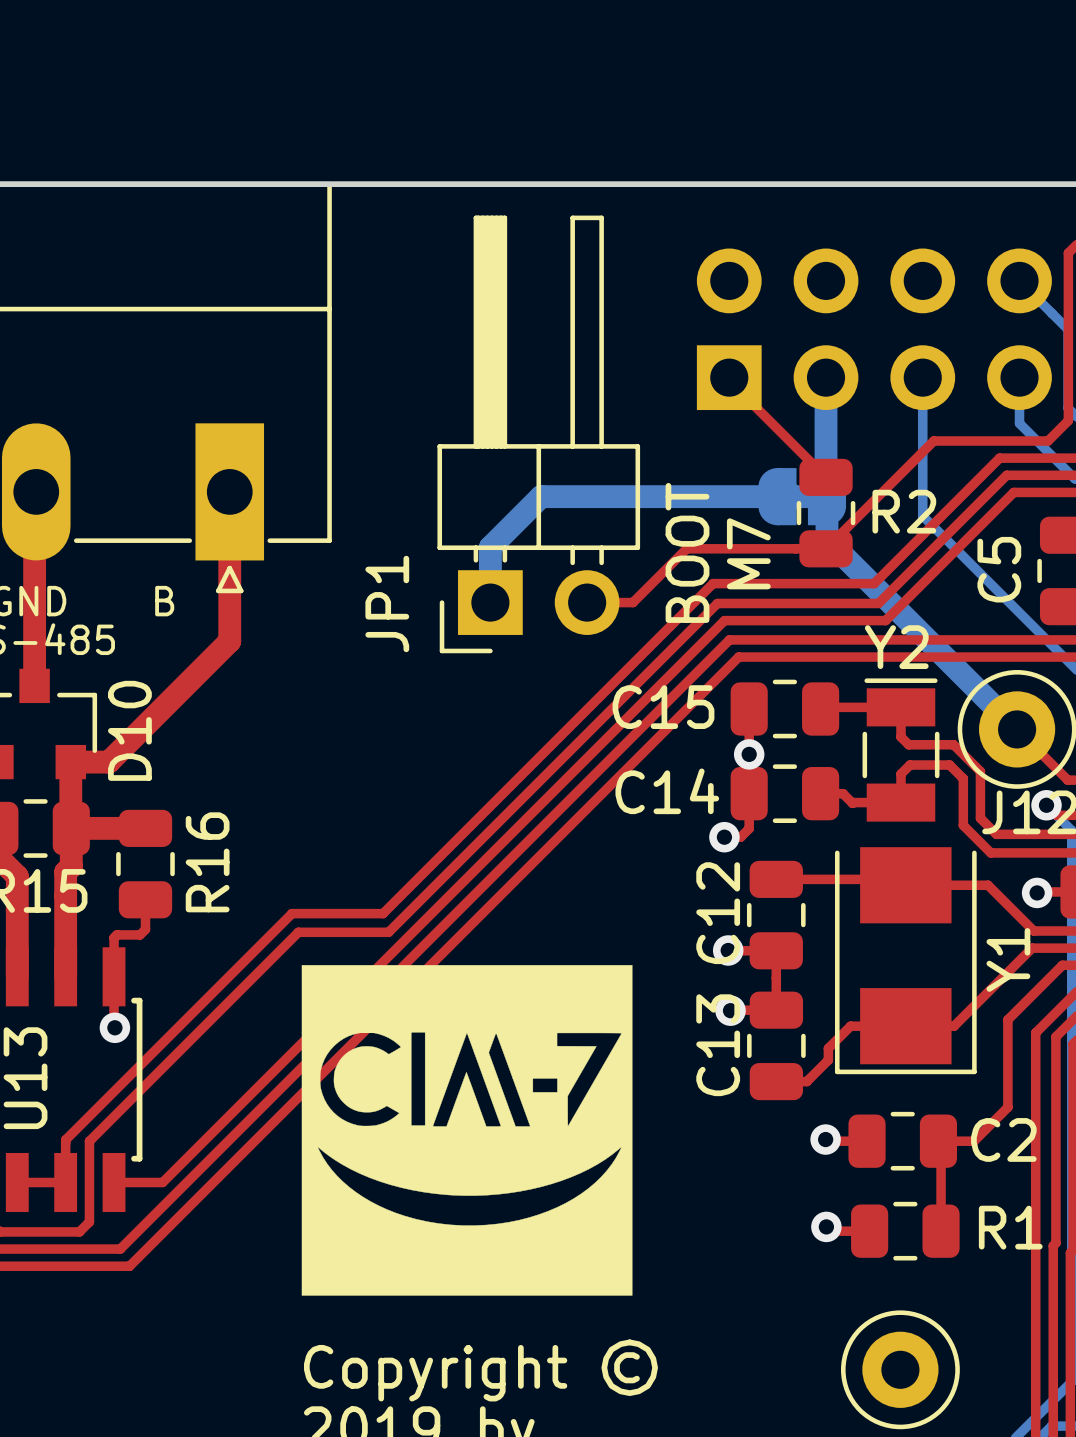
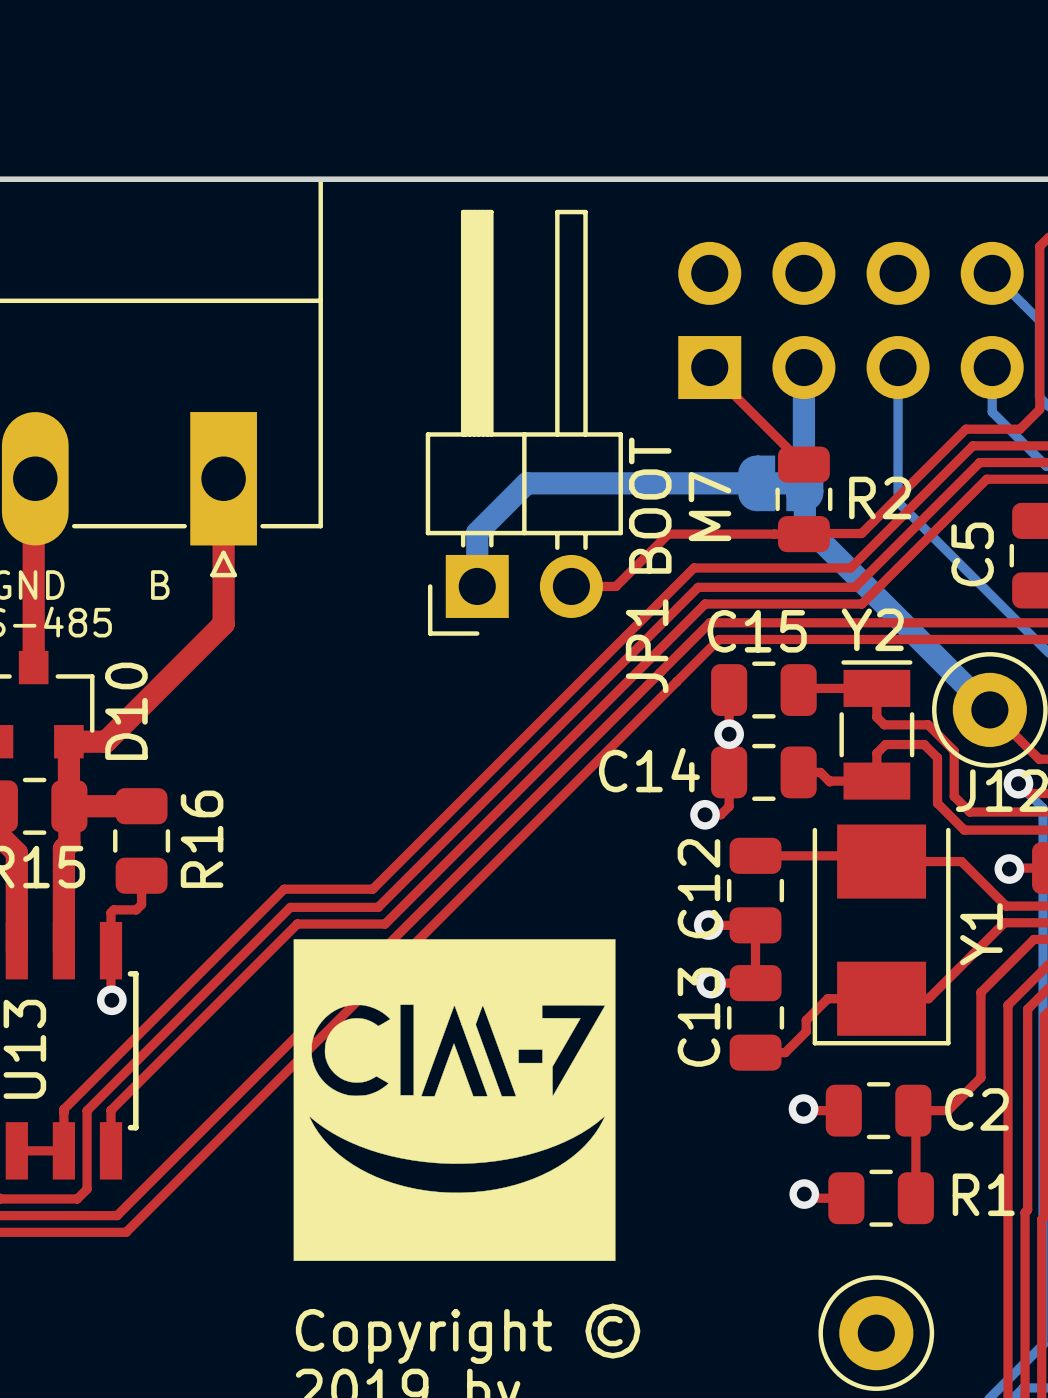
top track: (992, 441) (933, 441) (826, 548) -> (965, 429) (861, 533) (804, 533)
text position: BOOT (687, 552) -> BOOT (650, 505)
text position: M7 (748, 553) -> M7 (709, 506)
JP1 name position: JP1 (387, 603) -> JP1 (647, 646)
C15 name position: C15 (663, 707) -> C15 (757, 631)
top track: (395, 949) (162, 1182) (114, 1182) -> (385, 924) (297, 924) (110, 1110) (110, 1150)

